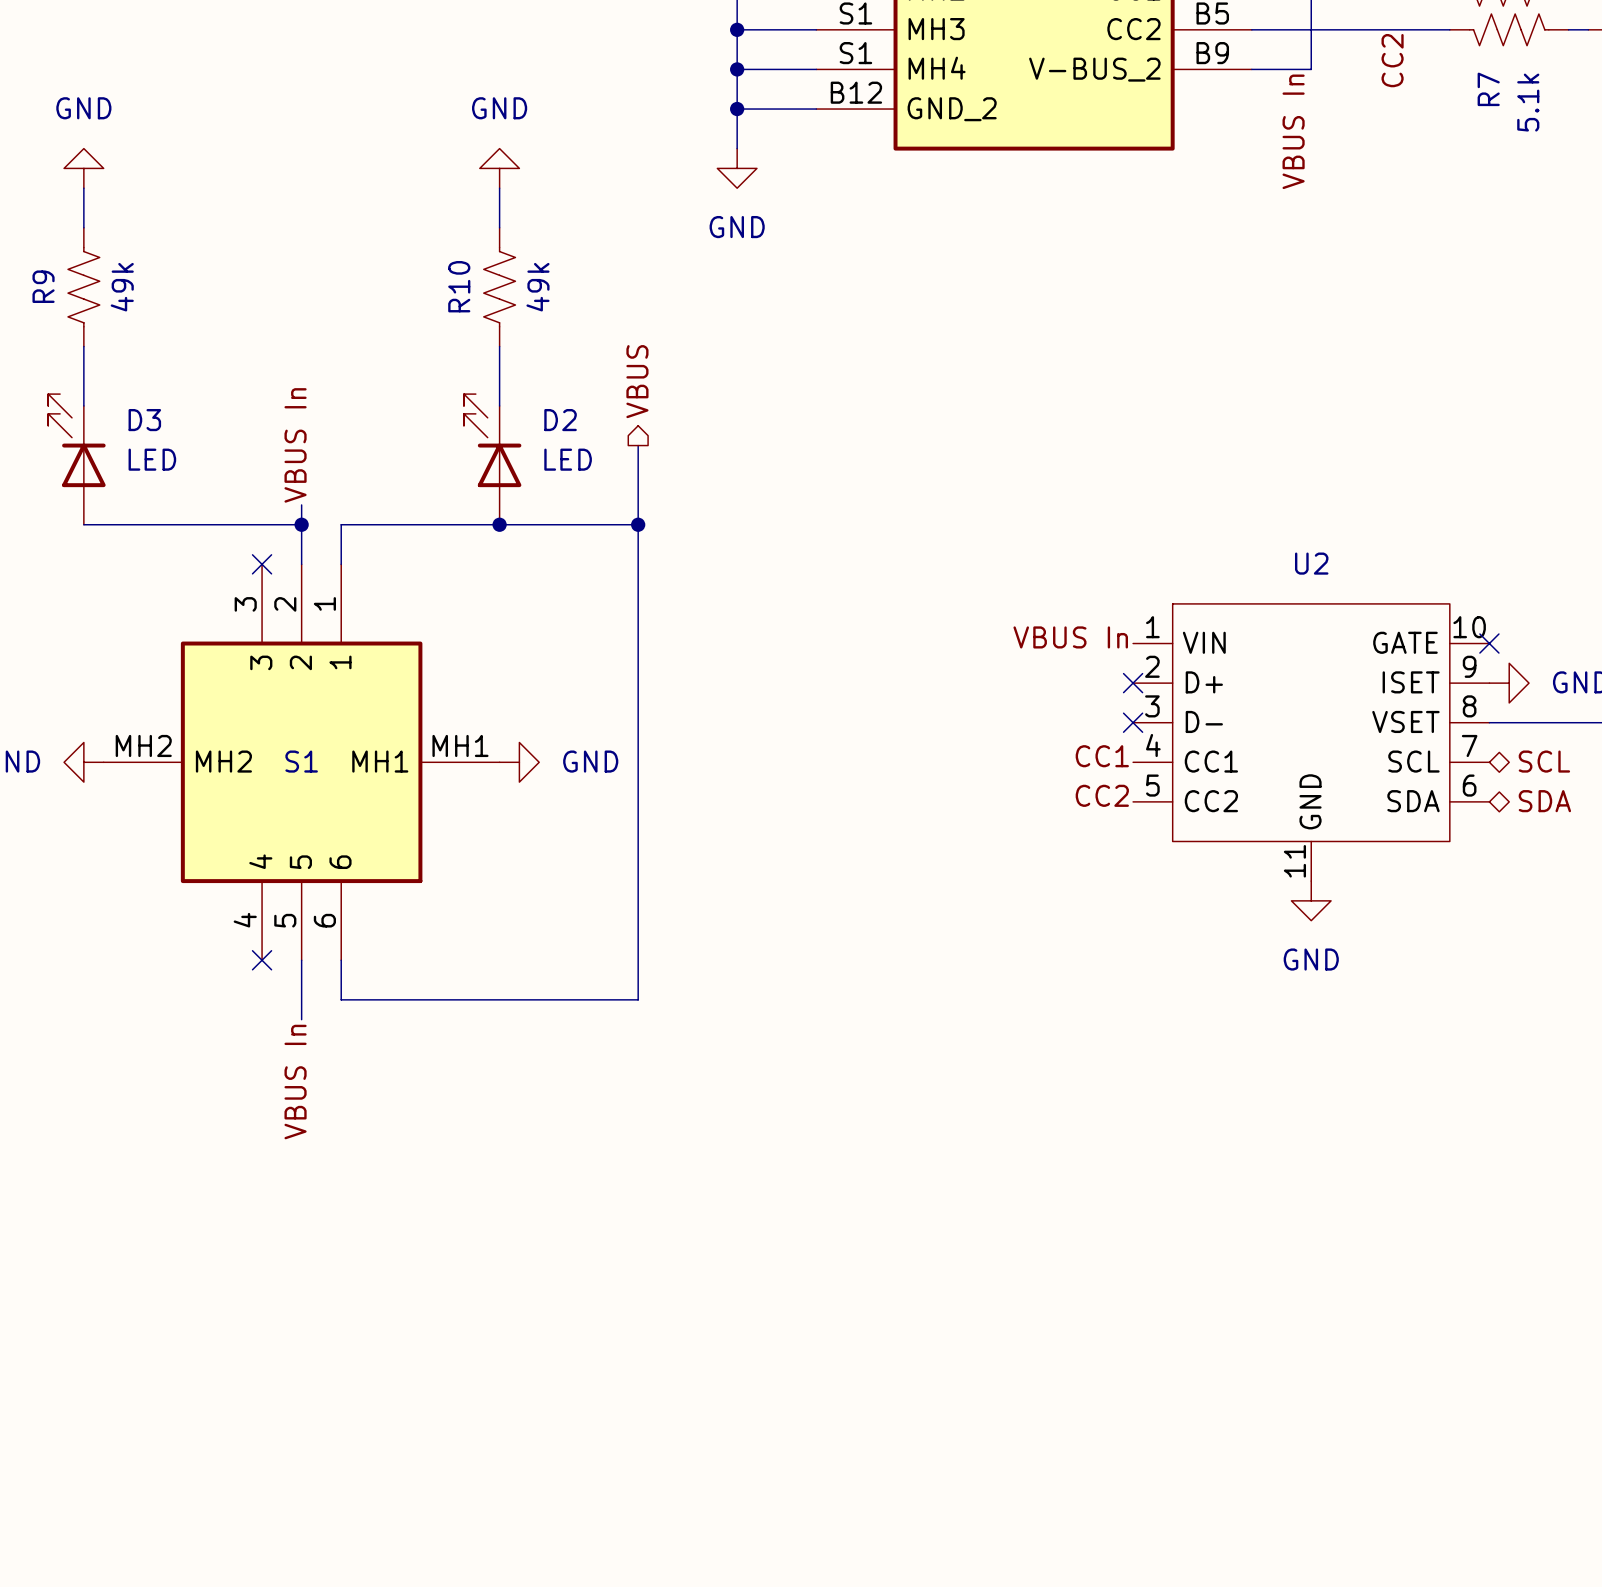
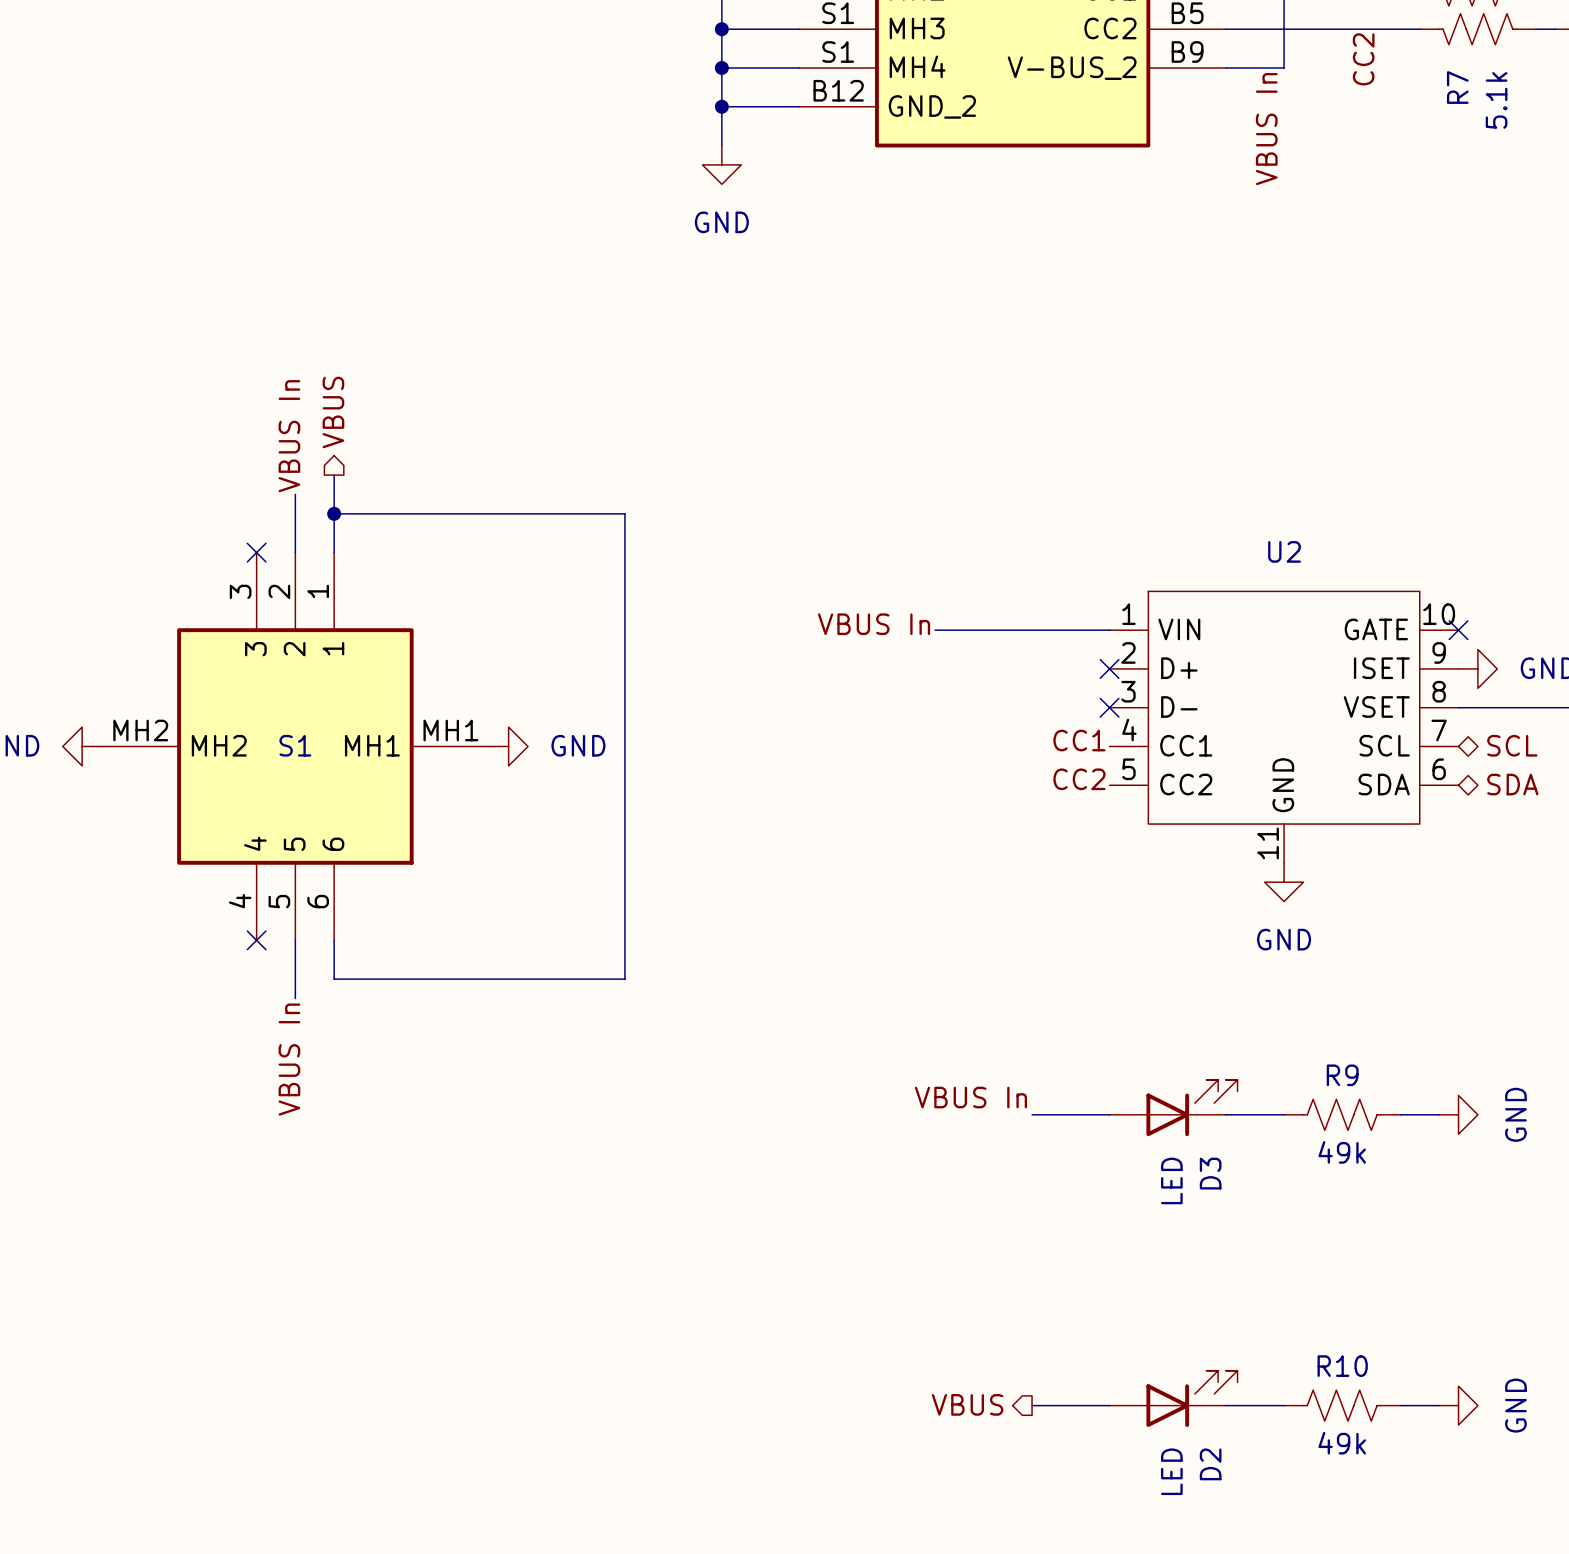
power symbol: GND (83, 168) -> none
power symbol: GND (499, 168) -> none
wire: (83, 188) (83, 227) -> none
wire: (499, 188) (499, 227) -> (334, 475) (334, 513)
R9 rotation: 0° (83, 287) -> 90° clockwise (1342, 1114)
R9 position: (83, 287) -> (1342, 1114)
R10 rotation: 0° (499, 287) -> 90° clockwise (1342, 1405)
R10 position: (499, 287) -> (1342, 1405)
wire: (83, 346) (83, 405) -> none
wire: (499, 346) (499, 405) -> none
hierarchical label position: VBUS (637, 381) -> VBUS (333, 412)
D3 rotation: 0° (76, 440) -> 90° clockwise (1191, 1108)
D2 rotation: 0° (492, 440) -> 90° clockwise (1191, 1398)
wire: (638, 445) (638, 524) -> none
D3 position: (76, 459) -> (1173, 1108)
D2 position: (492, 459) -> (1173, 1398)
wire: (83, 524) (301, 524) -> none
junction position: (301, 524) -> (334, 513)
junction: (499, 524) -> none
junction: (638, 524) -> none
label position: VBUS In (1070, 637) -> VBUS In (874, 624)
wire: none -> (935, 630) (1109, 630)
label: none -> VBUS In (970, 1097)
wire: none -> (1032, 1114) (1109, 1114)
wire: none -> (1225, 1114) (1284, 1114)
wire: none -> (1400, 1114) (1439, 1114)
power symbol: none -> GND (1458, 1114)
hierarchical label: none -> VBUS (967, 1404)
wire: none -> (1032, 1405) (1109, 1405)
wire: none -> (1225, 1405) (1284, 1405)
wire: none -> (1400, 1405) (1439, 1405)
power symbol: none -> GND (1458, 1405)

